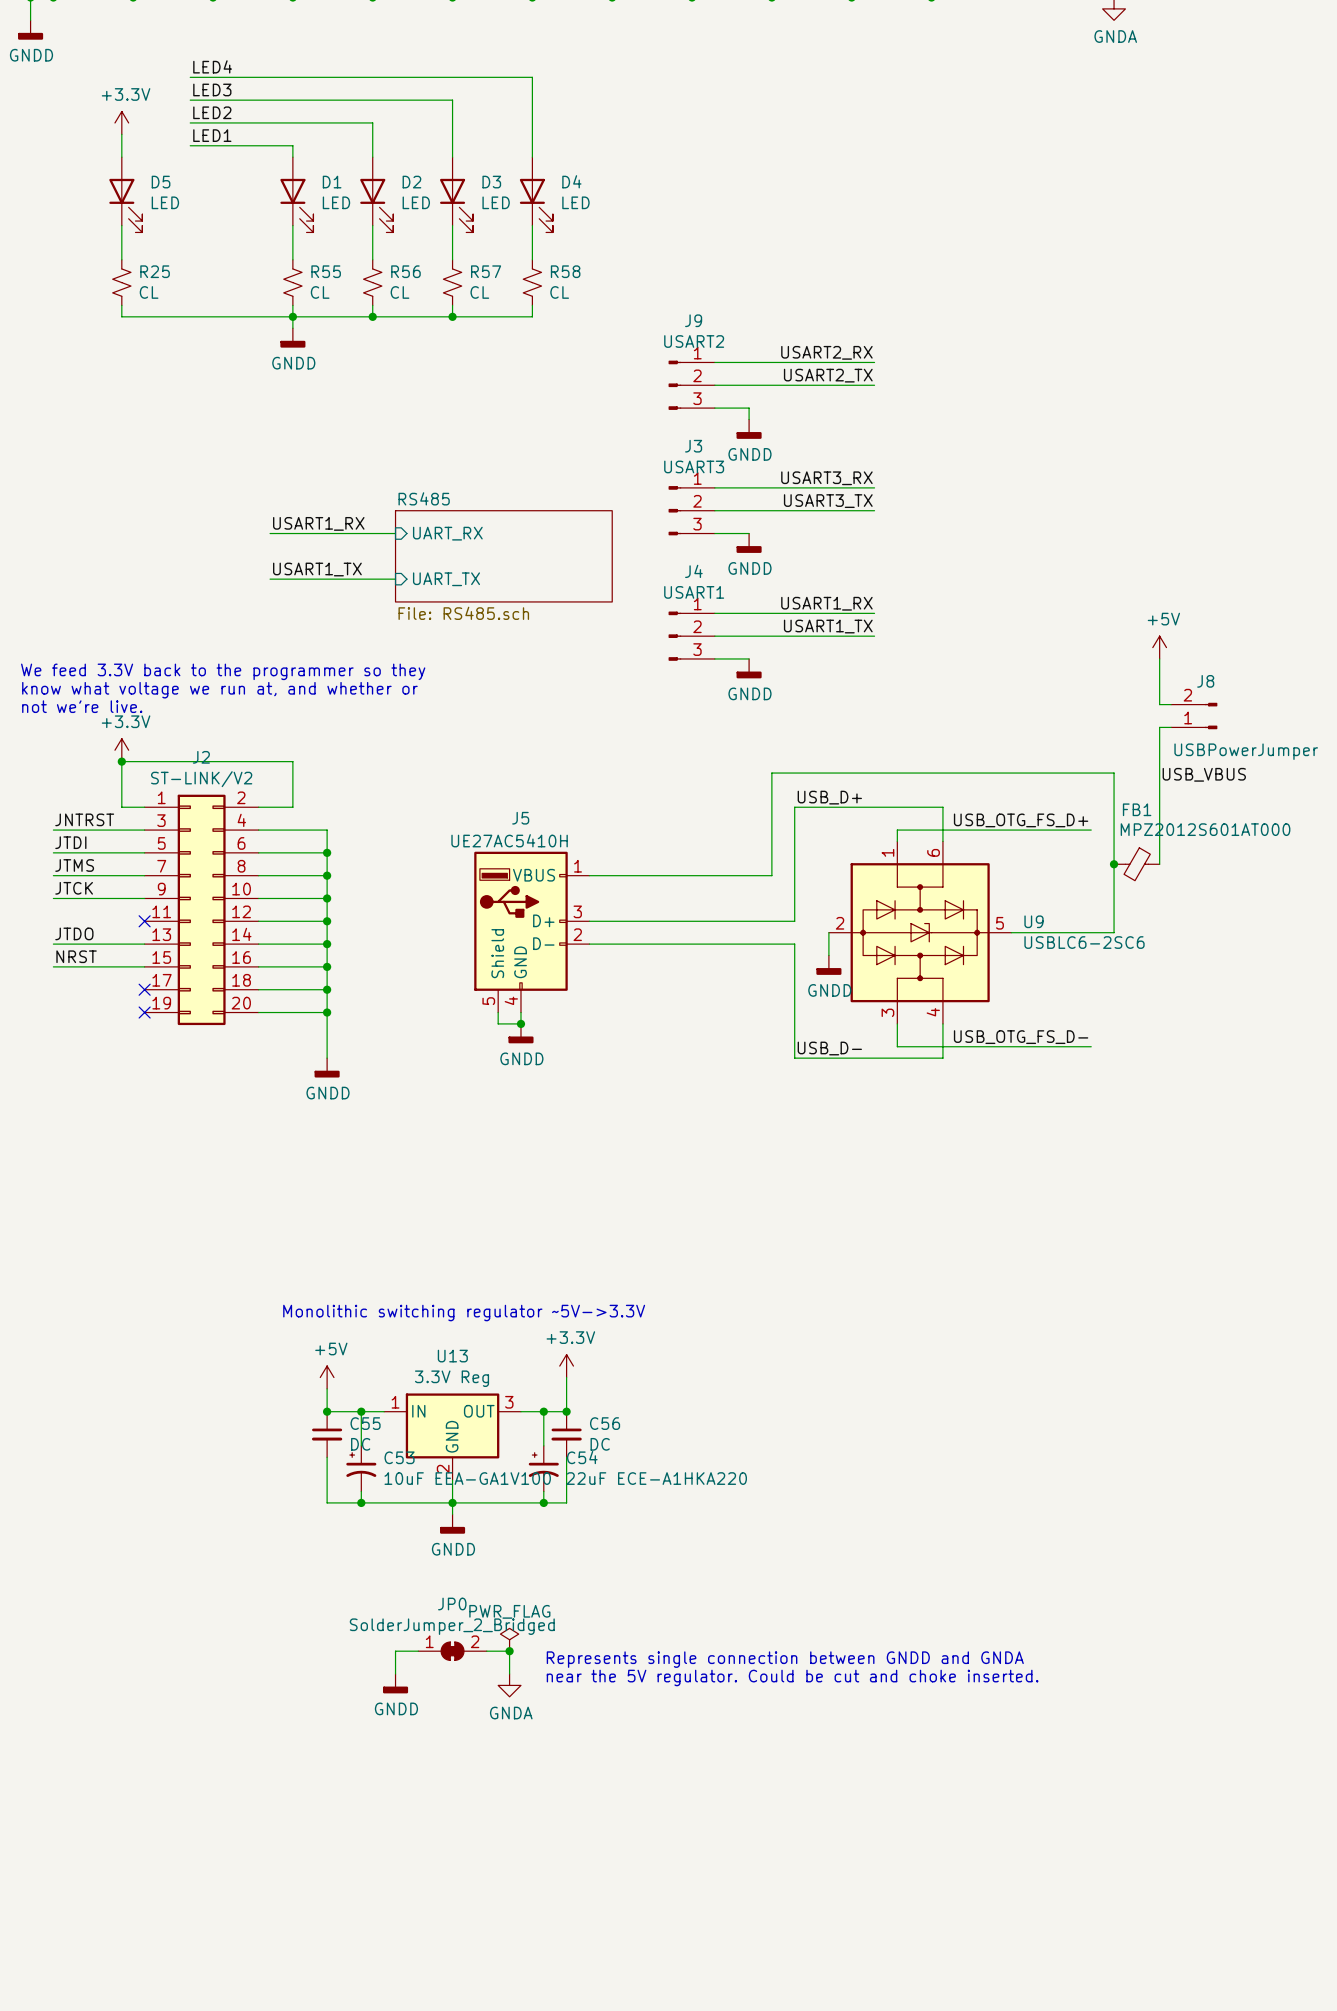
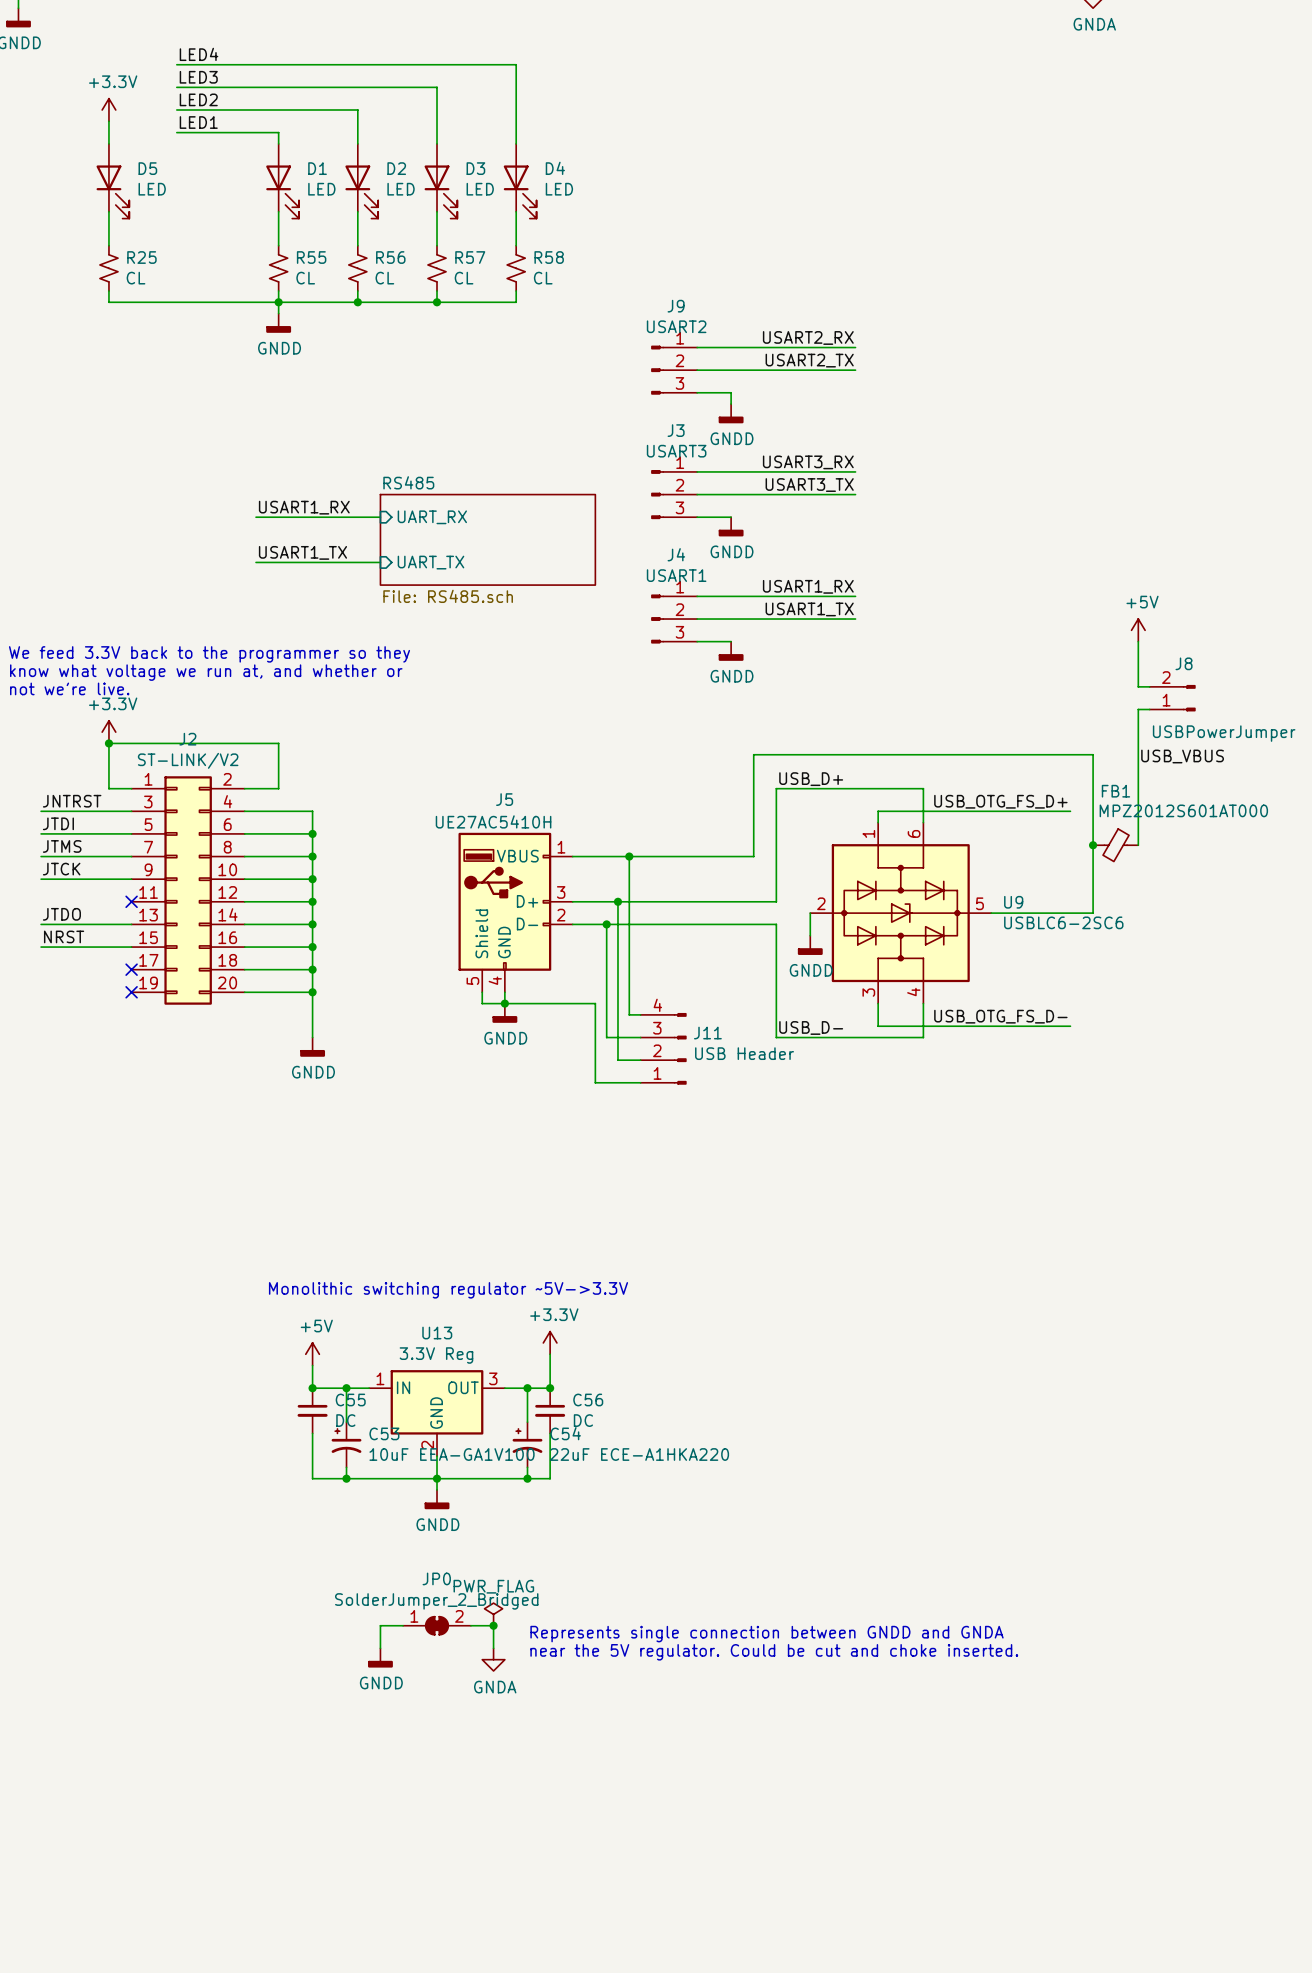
wire: none -> (629, 856) (629, 1014) (640, 1014)
junction: none -> (629, 856)
wire: none -> (617, 901) (617, 1060) (640, 1060)
junction: none -> (617, 901)
wire: none -> (606, 924) (606, 1037) (640, 1037)
junction: none -> (606, 924)
wire: none -> (504, 1003) (595, 1003) (595, 1082) (640, 1082)
J11: none -> USB Header (663, 1048)

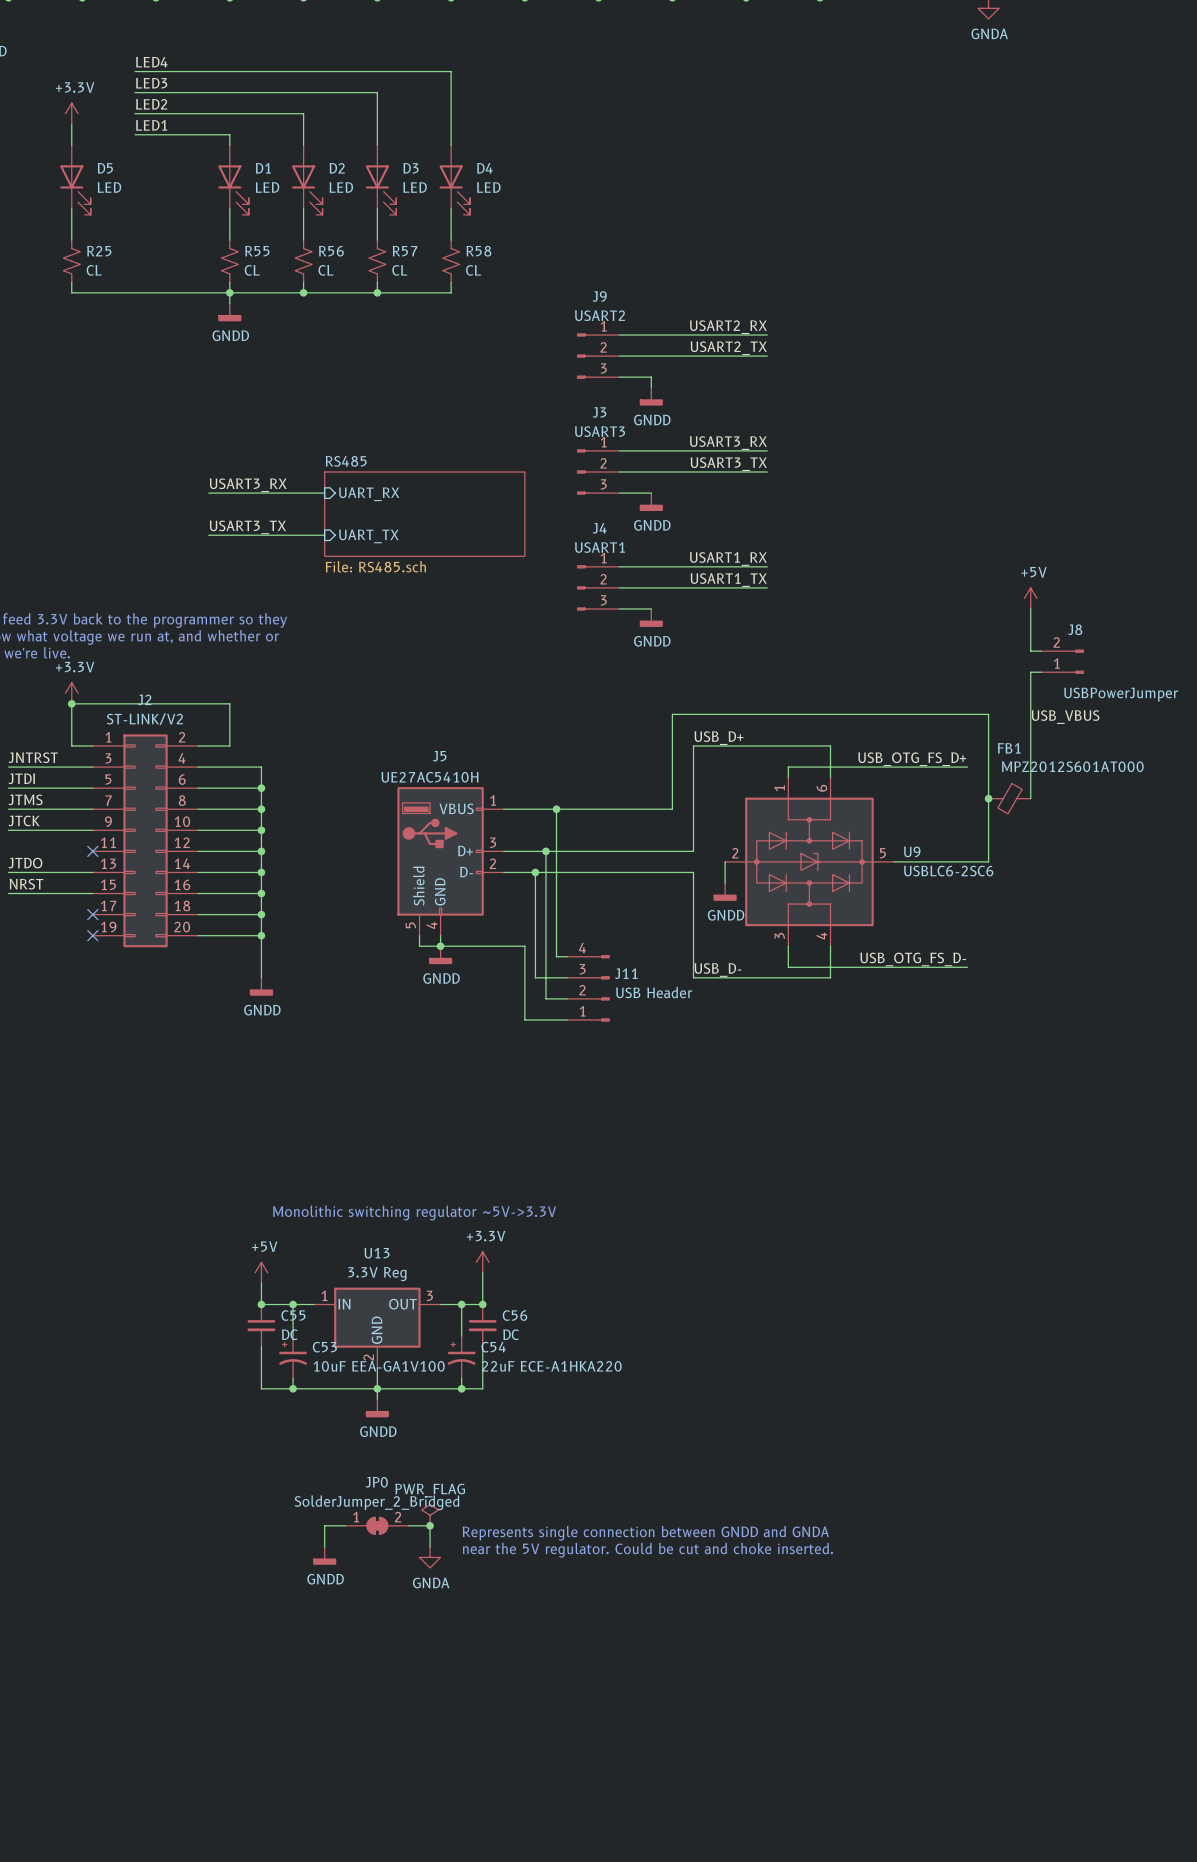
label: USART1_RX (304, 507) -> USART3_RX (248, 485)
label: USART1_TX (302, 552) -> USART3_TX (247, 527)

